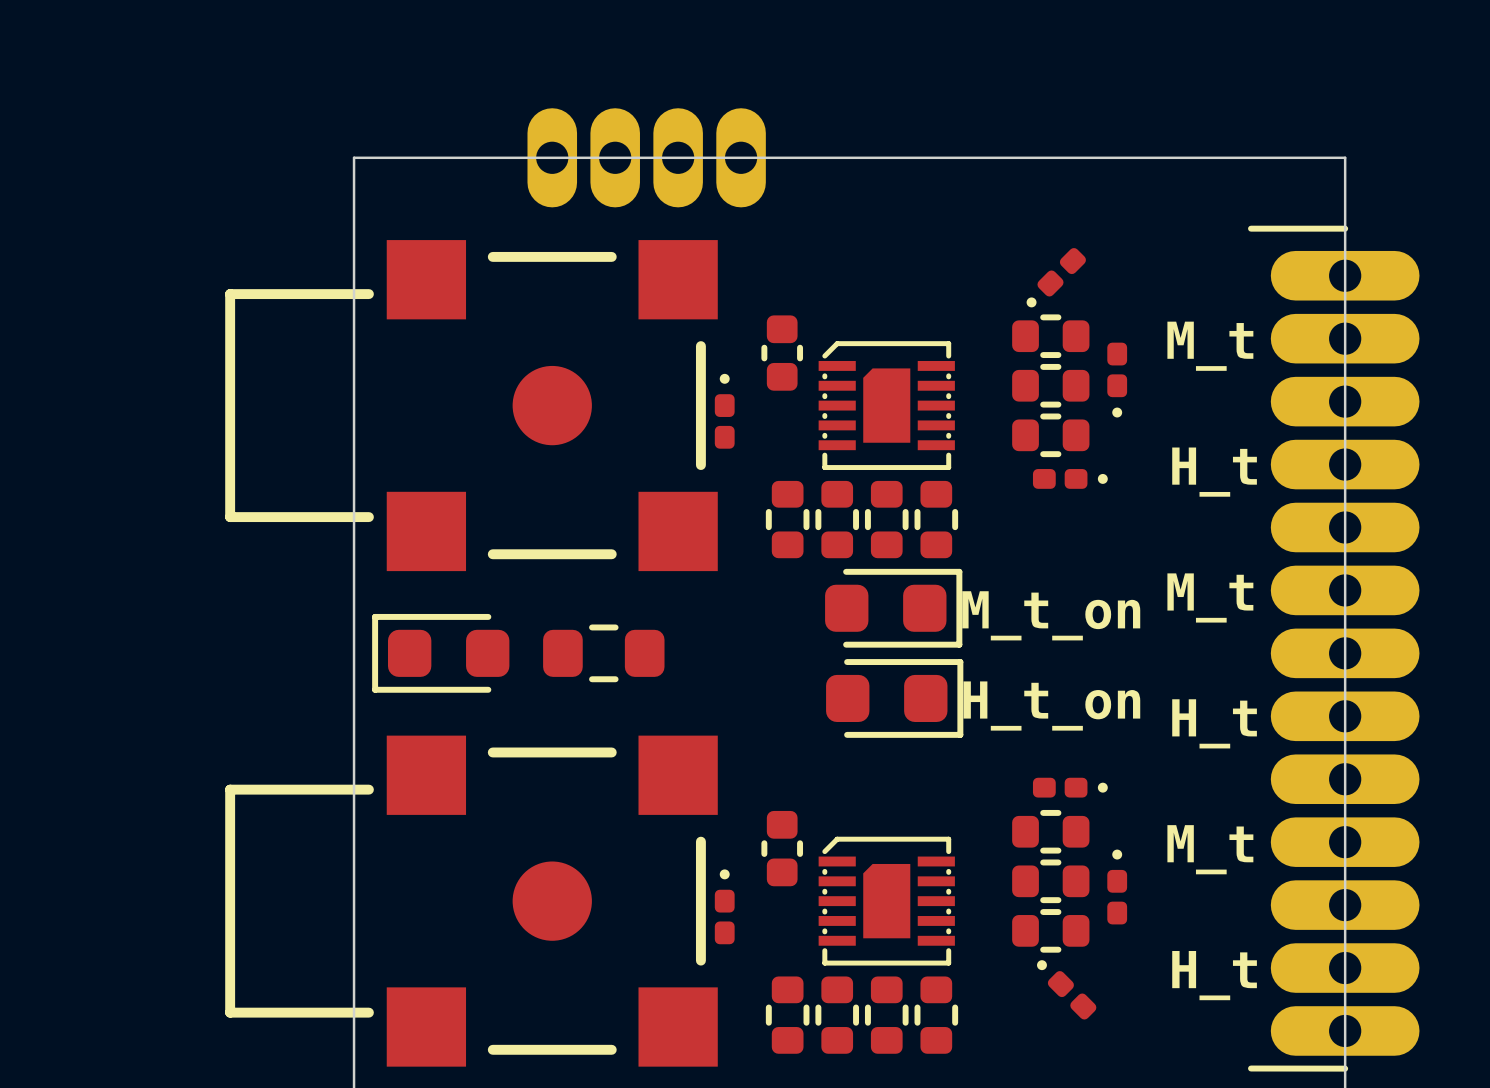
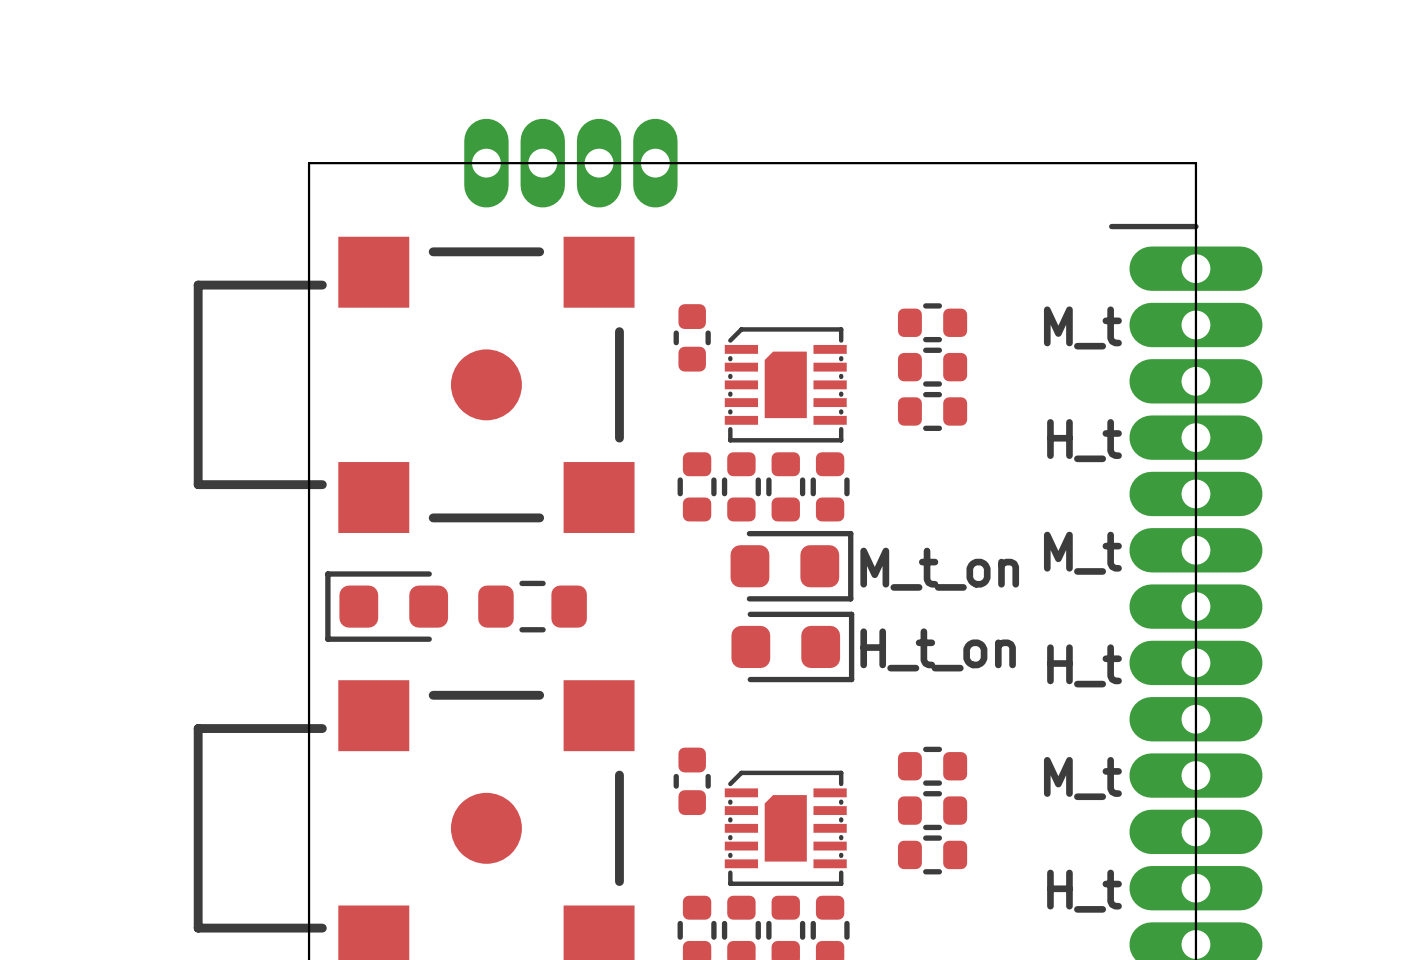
part: (1056, 277) -> none
part: (1117, 380) -> none
part: (724, 411) -> none
part: (1070, 478) -> none
part: (1070, 787) -> none
part: (1117, 887) -> none
part: (724, 906) -> none
part: (1066, 989) -> none

